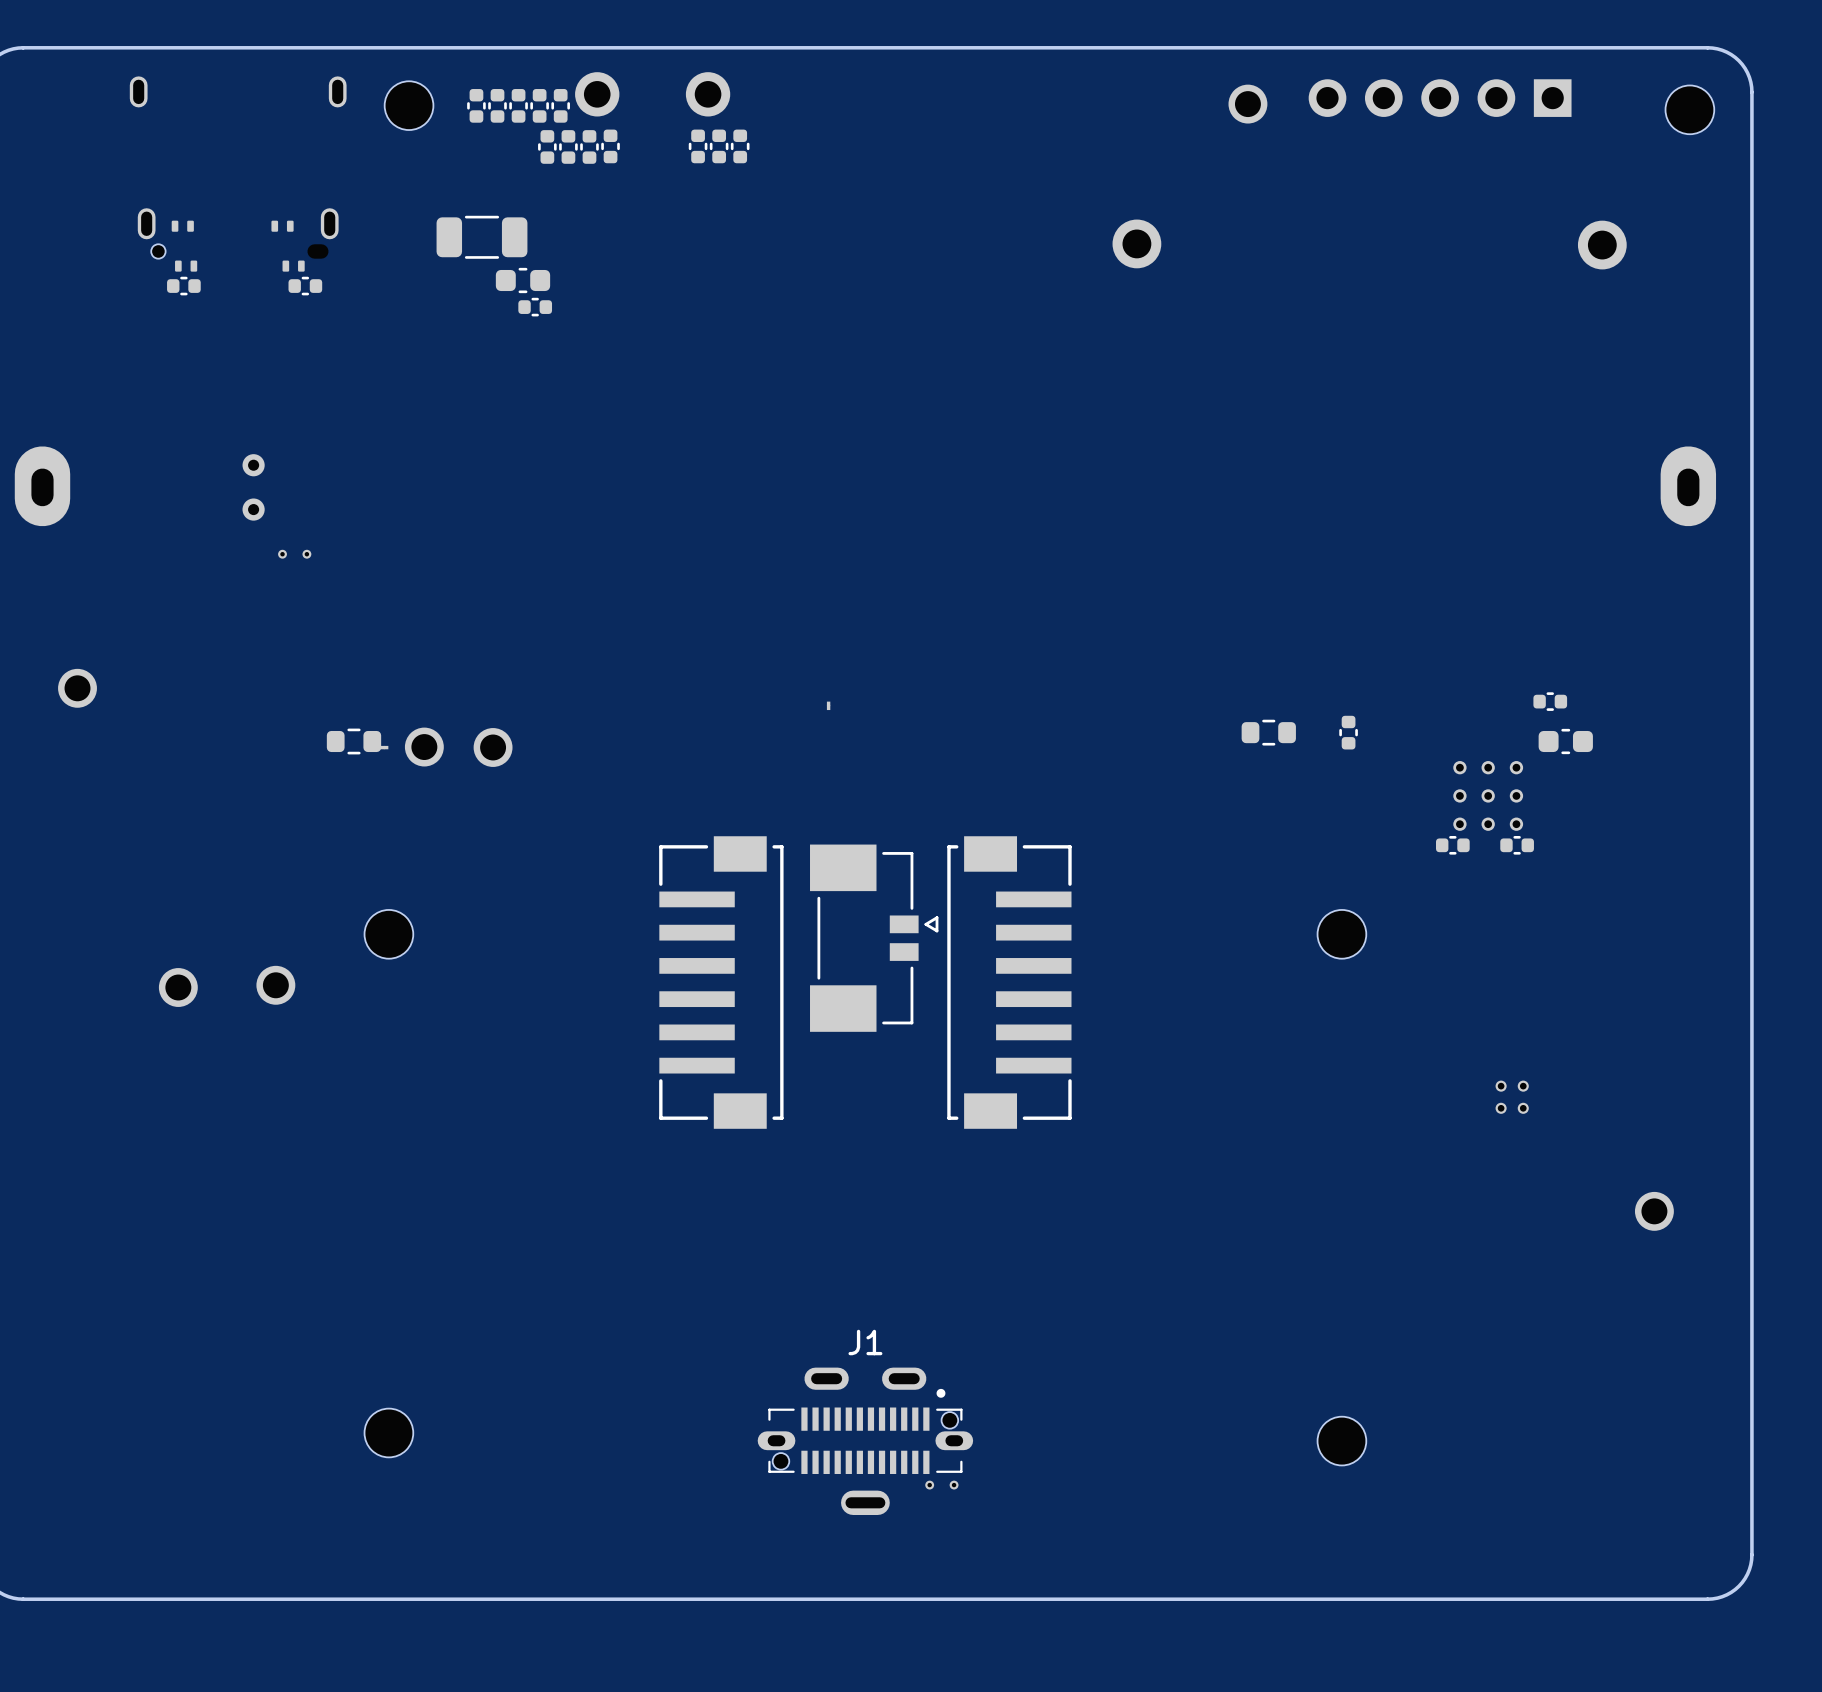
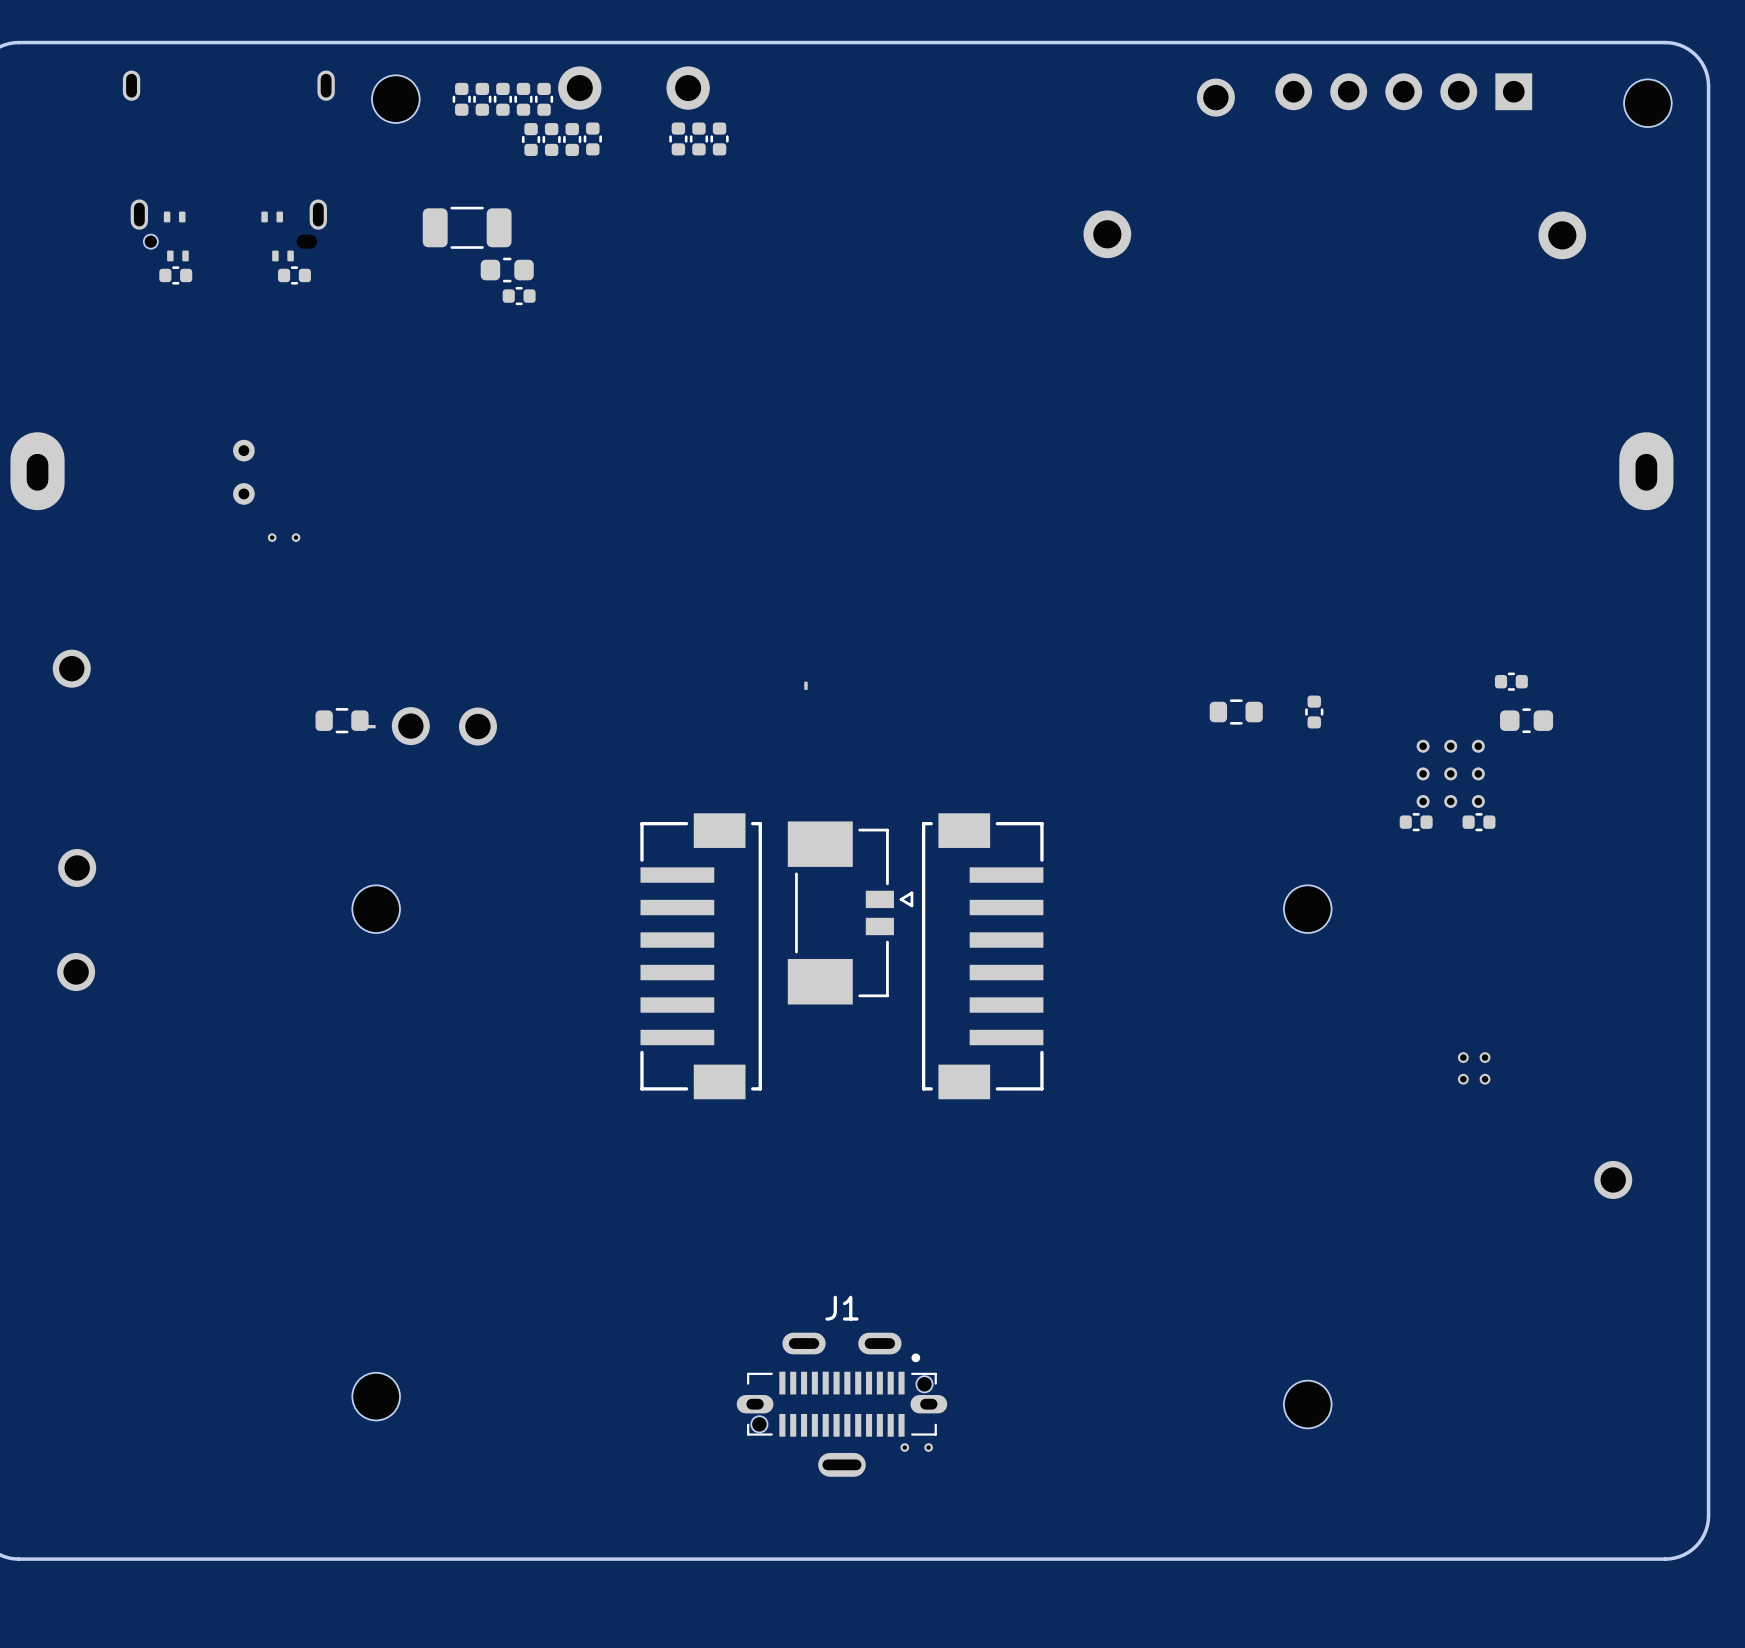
part: none -> (77, 867)
part: (275, 985) -> none
part: (178, 987) -> none
part: none -> (76, 971)

